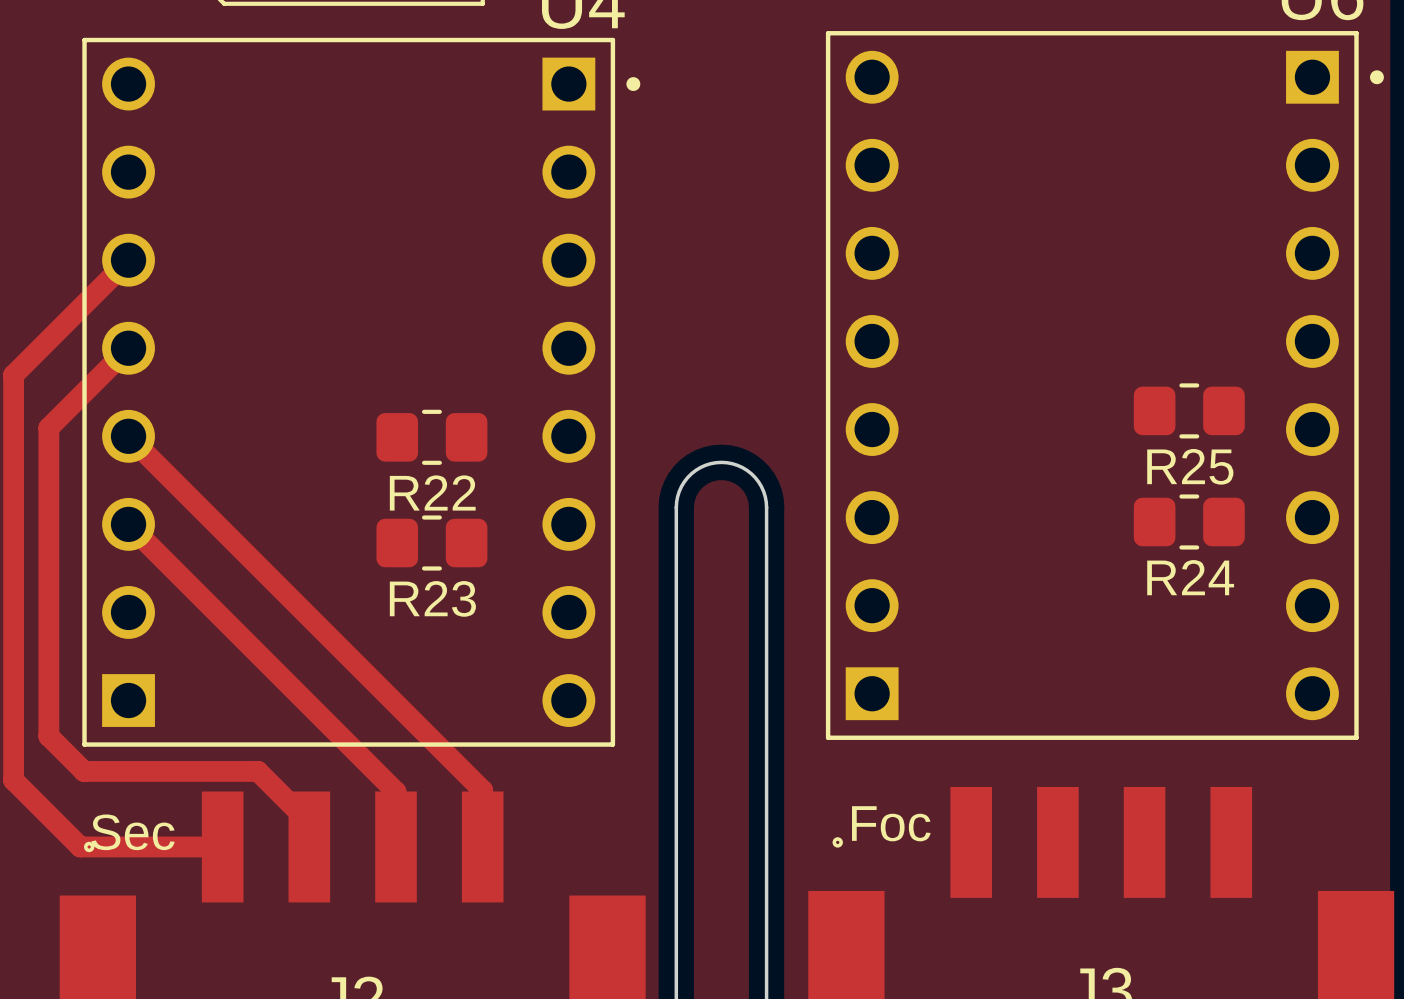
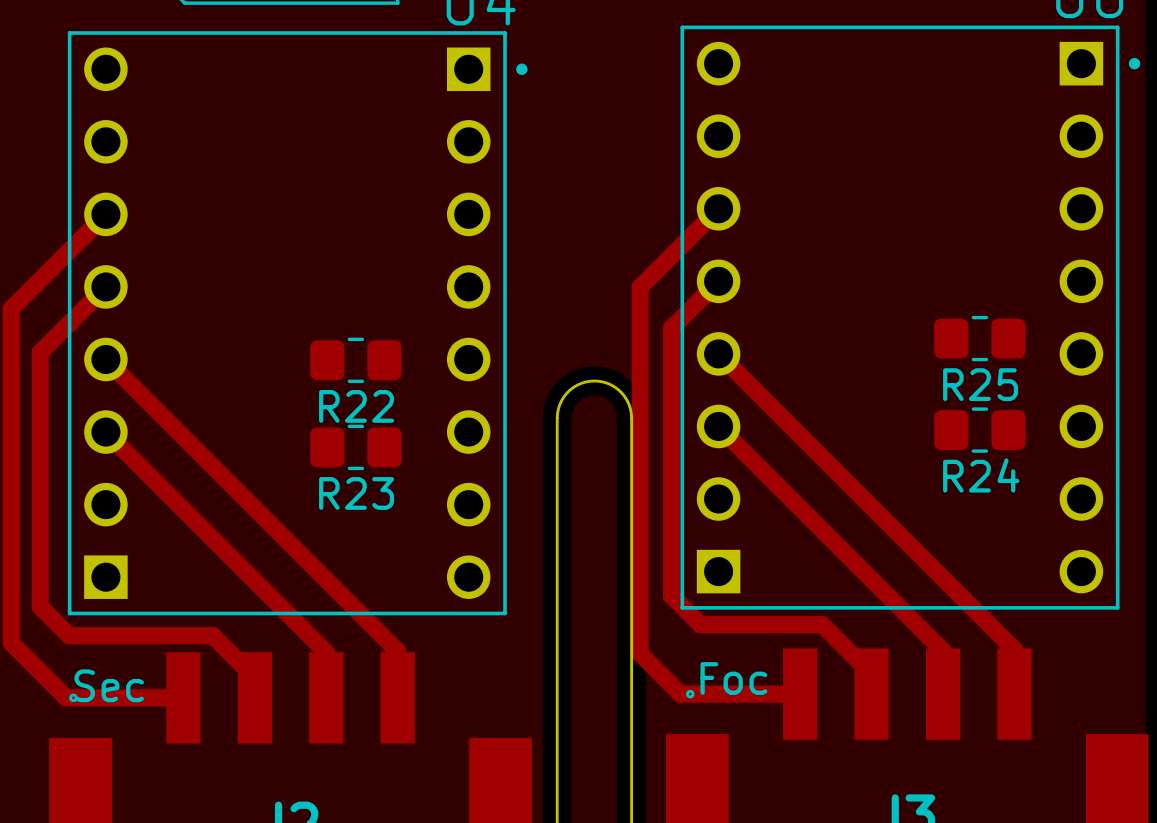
track: none -> (718, 208) (640, 287) (640, 653) (680, 694) (800, 694)
track: none -> (718, 281) (671, 328) (671, 595) (700, 624) (822, 624) (871, 674) (871, 694)
track: none -> (718, 353) (1014, 649) (1014, 694)
track: none -> (718, 426) (943, 650) (943, 694)

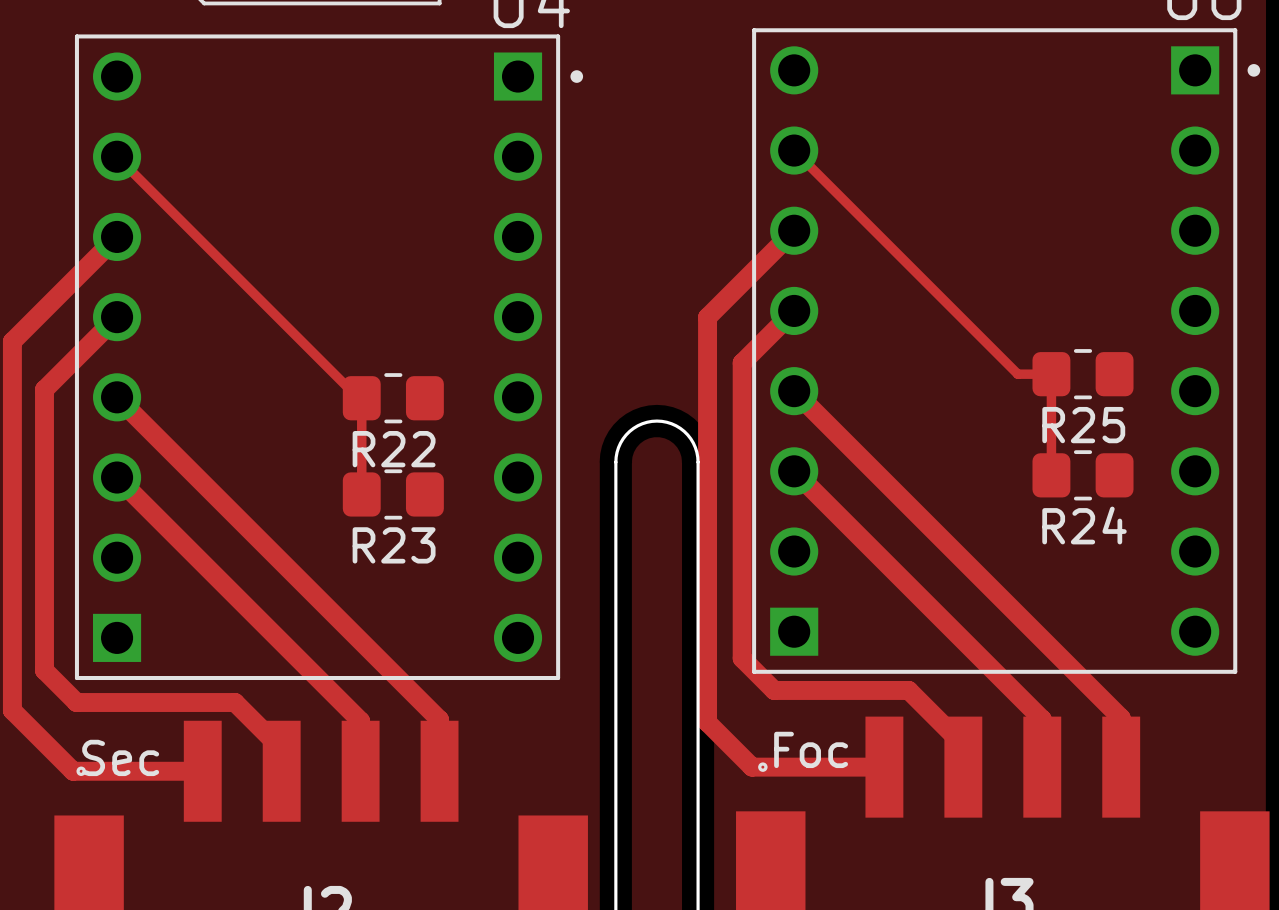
track: none -> (794, 150) (1017, 374) (1051, 374) (1051, 475)
track: none -> (117, 156) (358, 398) (361, 398) (361, 494)

